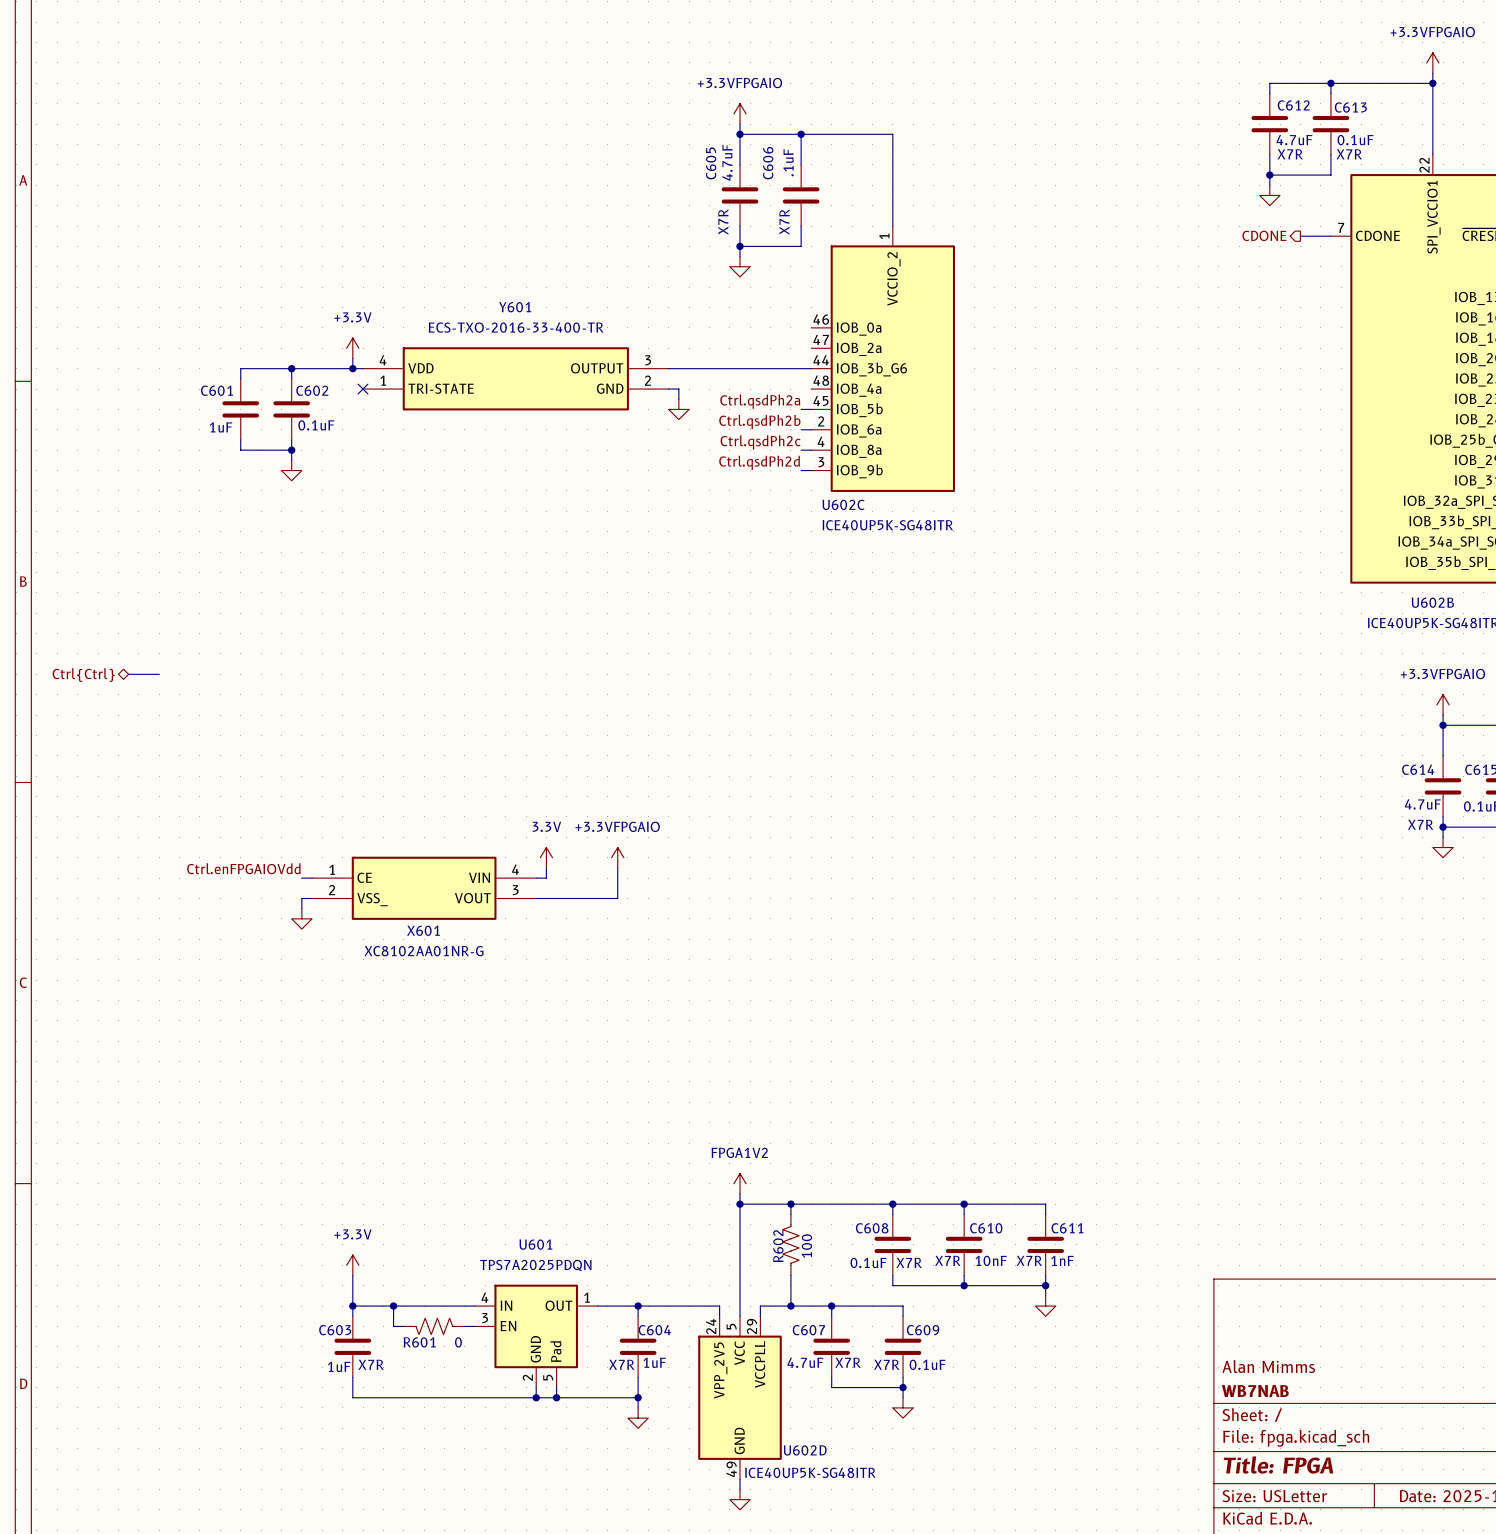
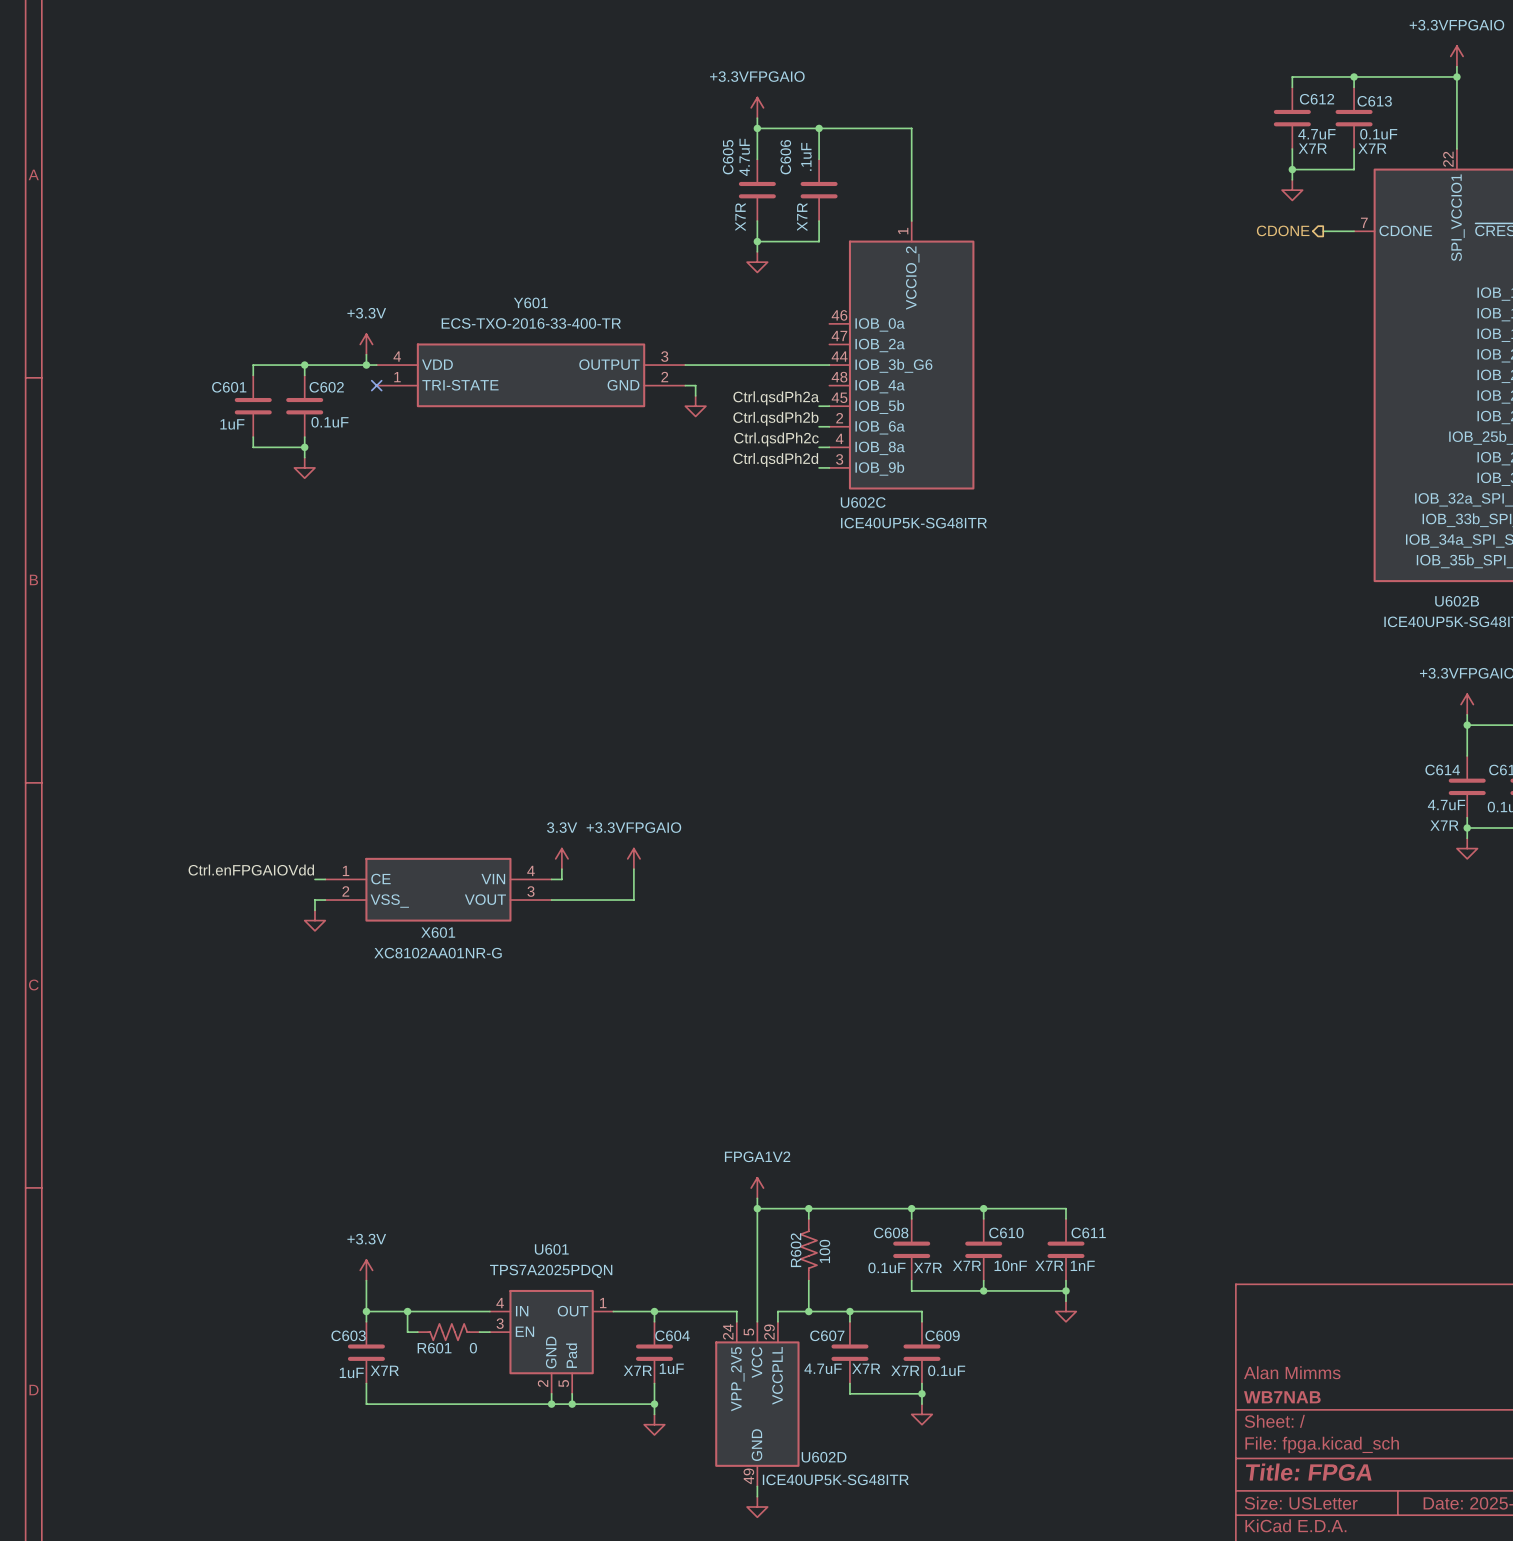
bus: (128, 674) (159, 674) -> none
hierarchical label: Ctrl{Ctrl} (83, 675) -> none

